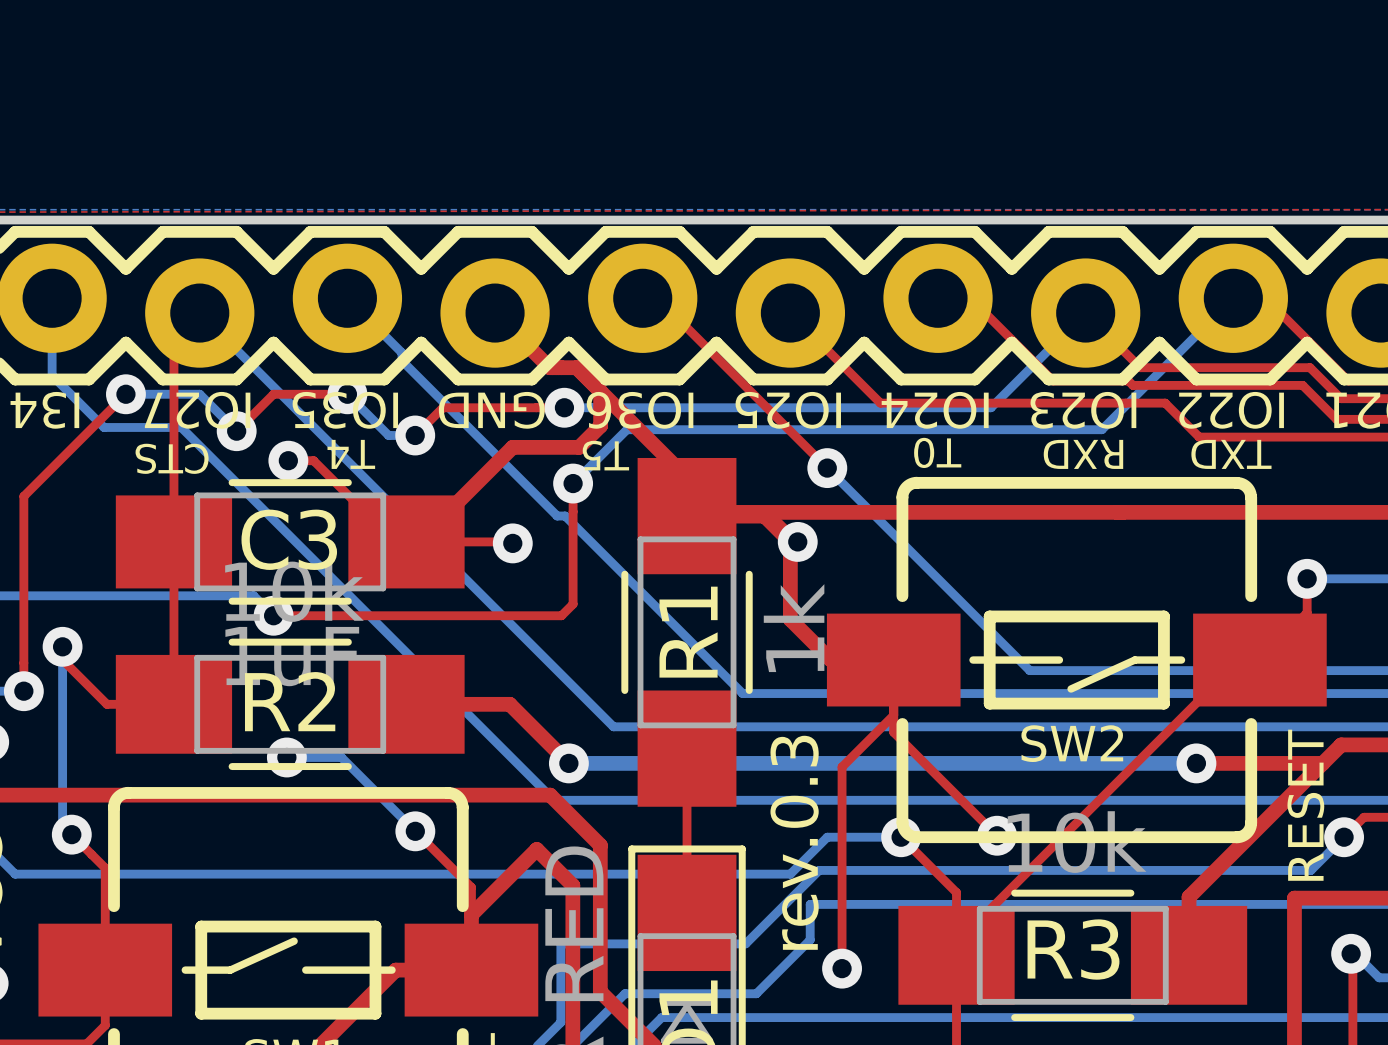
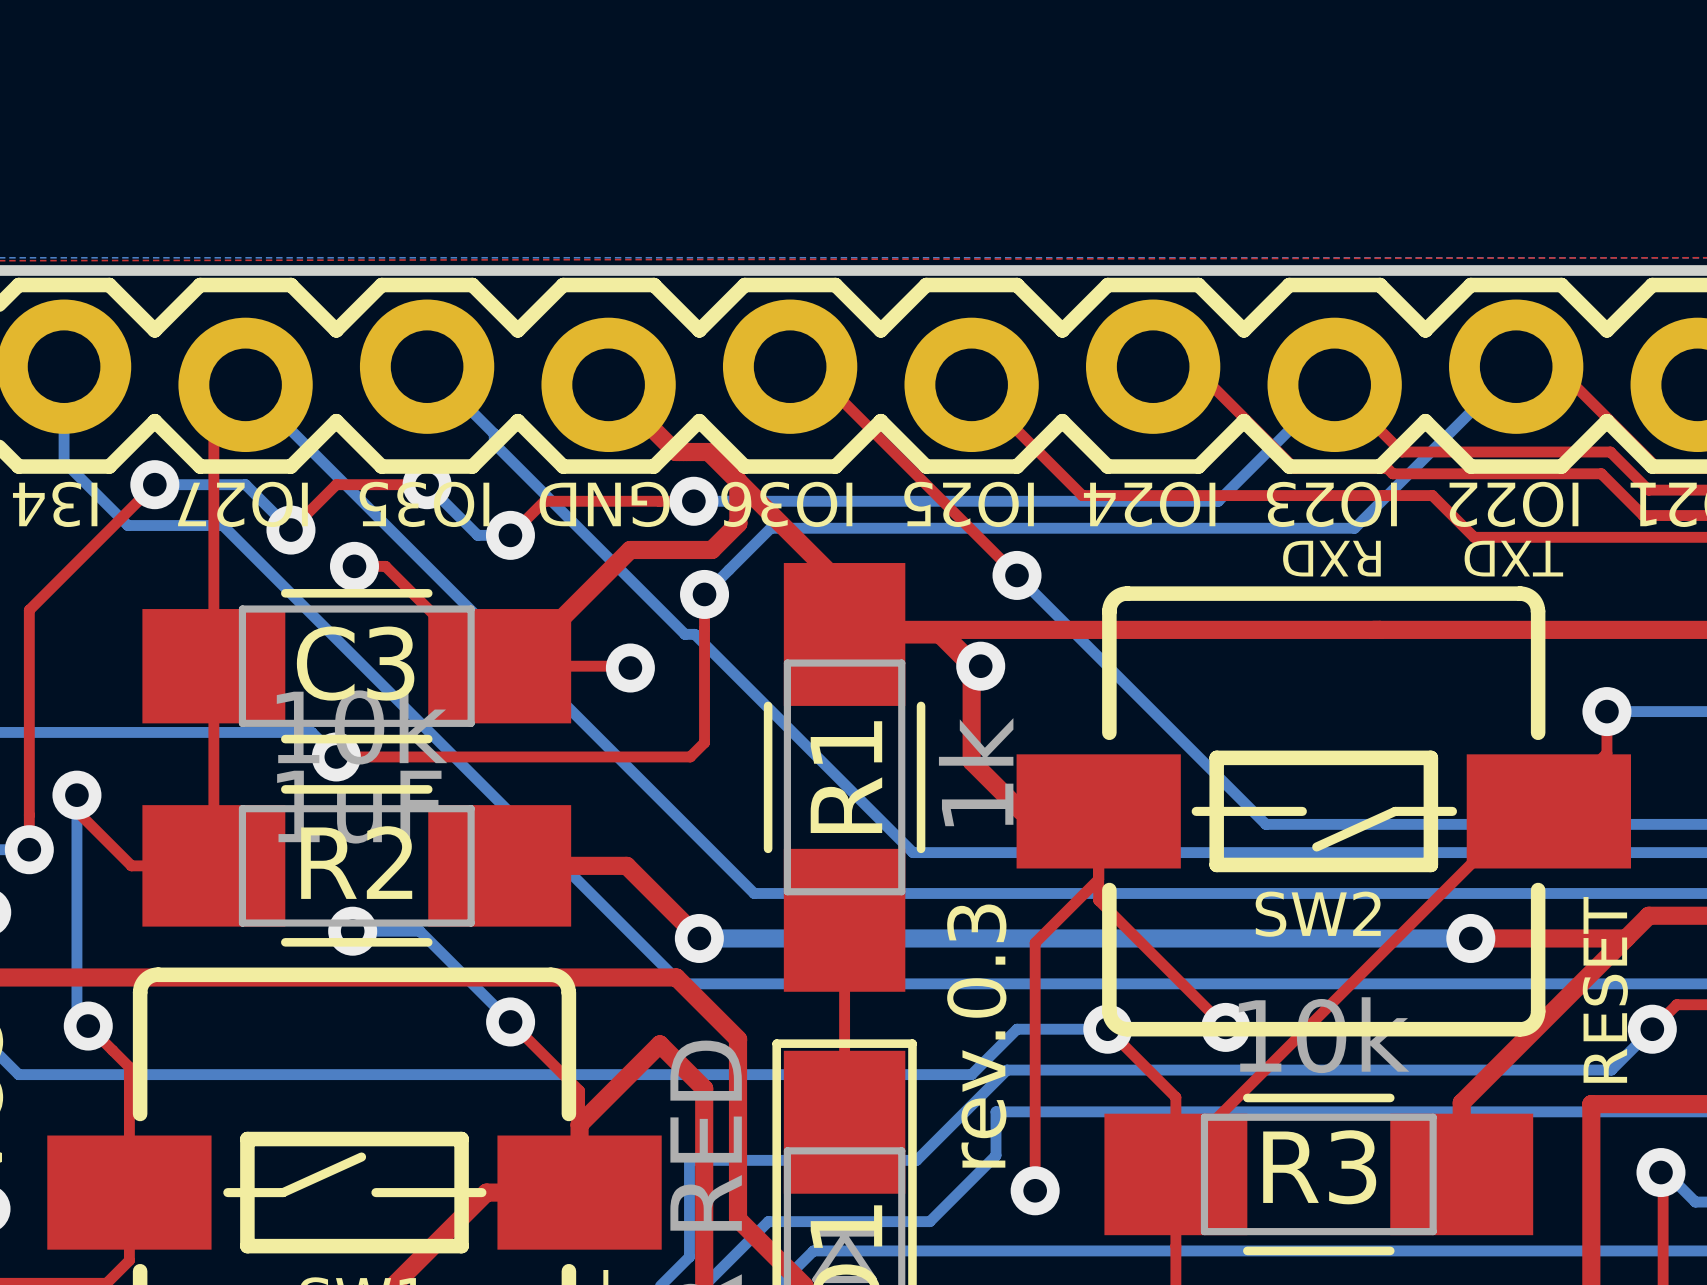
text: T0 (937, 452) -> none
text: T4 (351, 454) -> none
text: T5 (605, 455) -> none
text: CTS (172, 458) -> none

